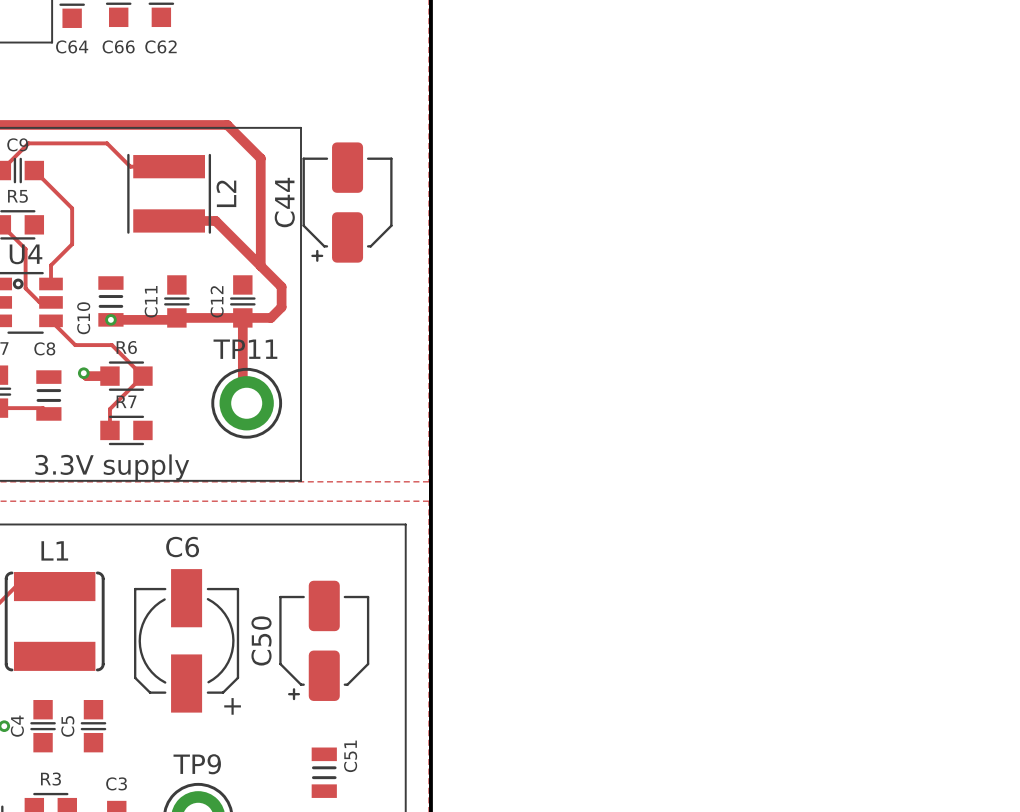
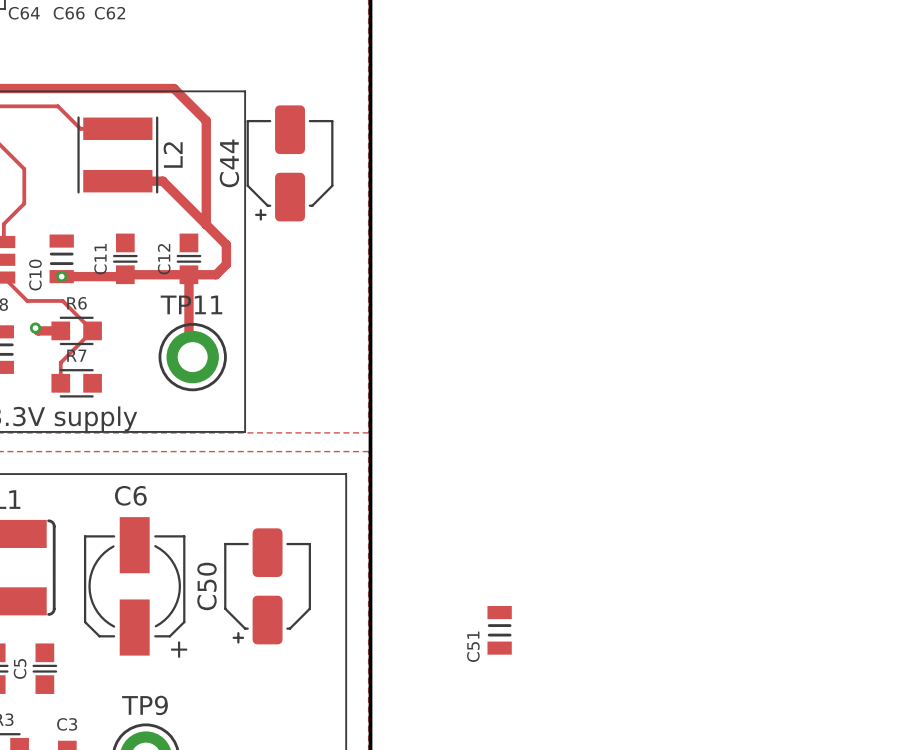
C51 name position: C51 (350, 756) -> C51 (473, 646)
C51 position: (324, 772) -> (499, 630)

